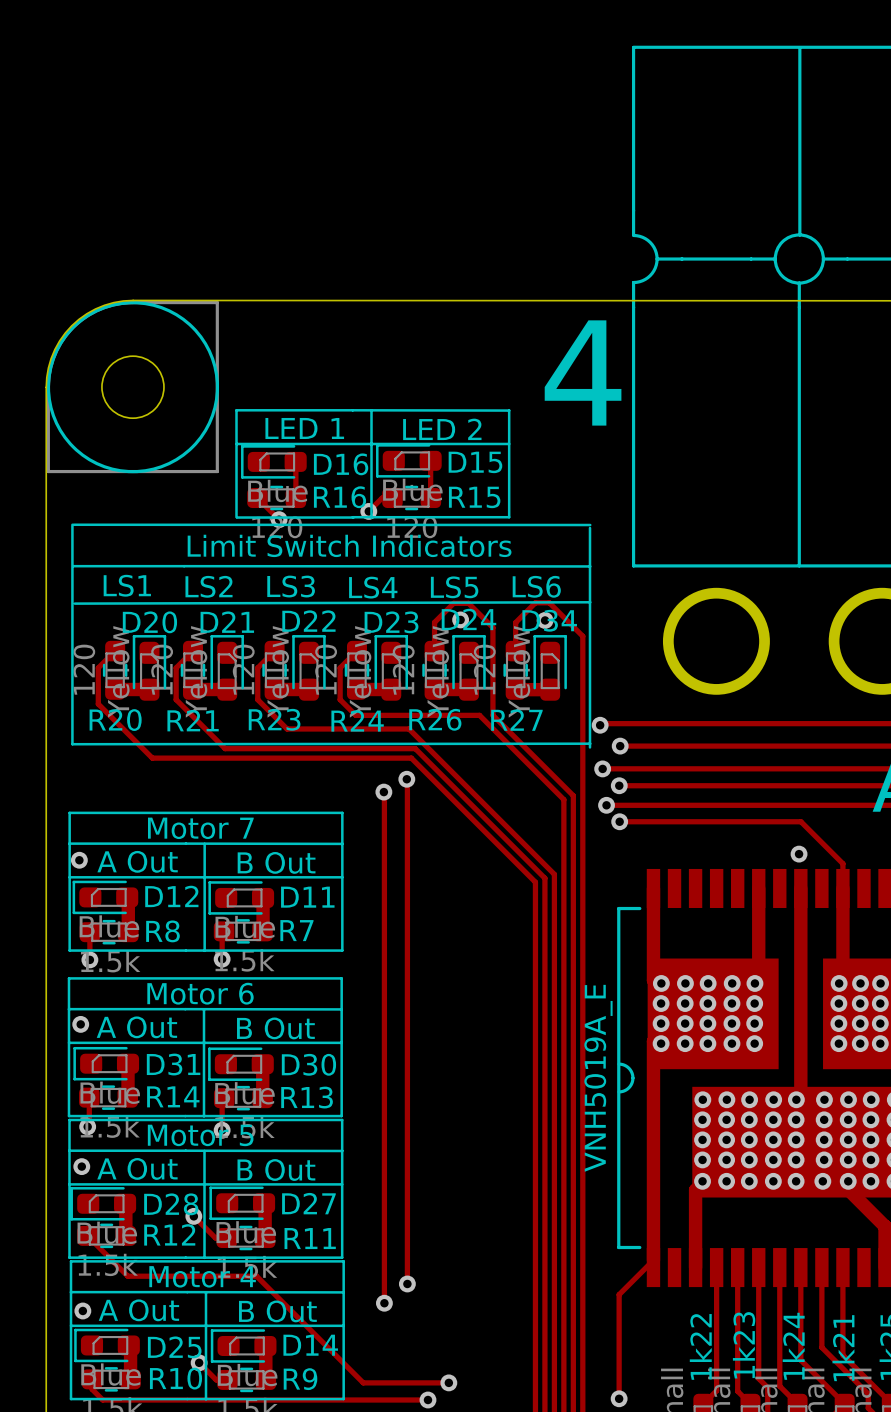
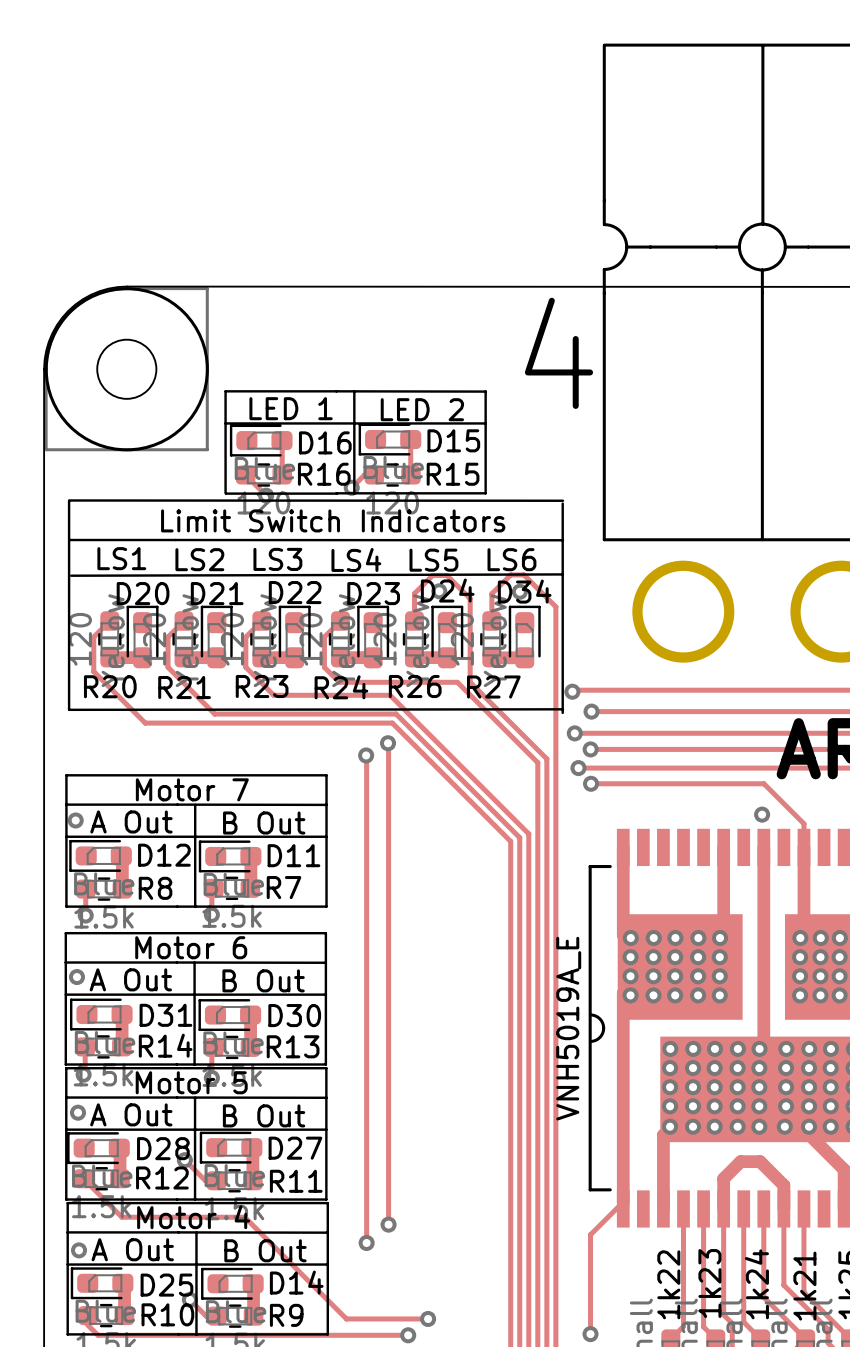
track: none -> (723, 1208) (723, 1178) (740, 1161) (760, 1161) (783, 1185) (783, 1208)

